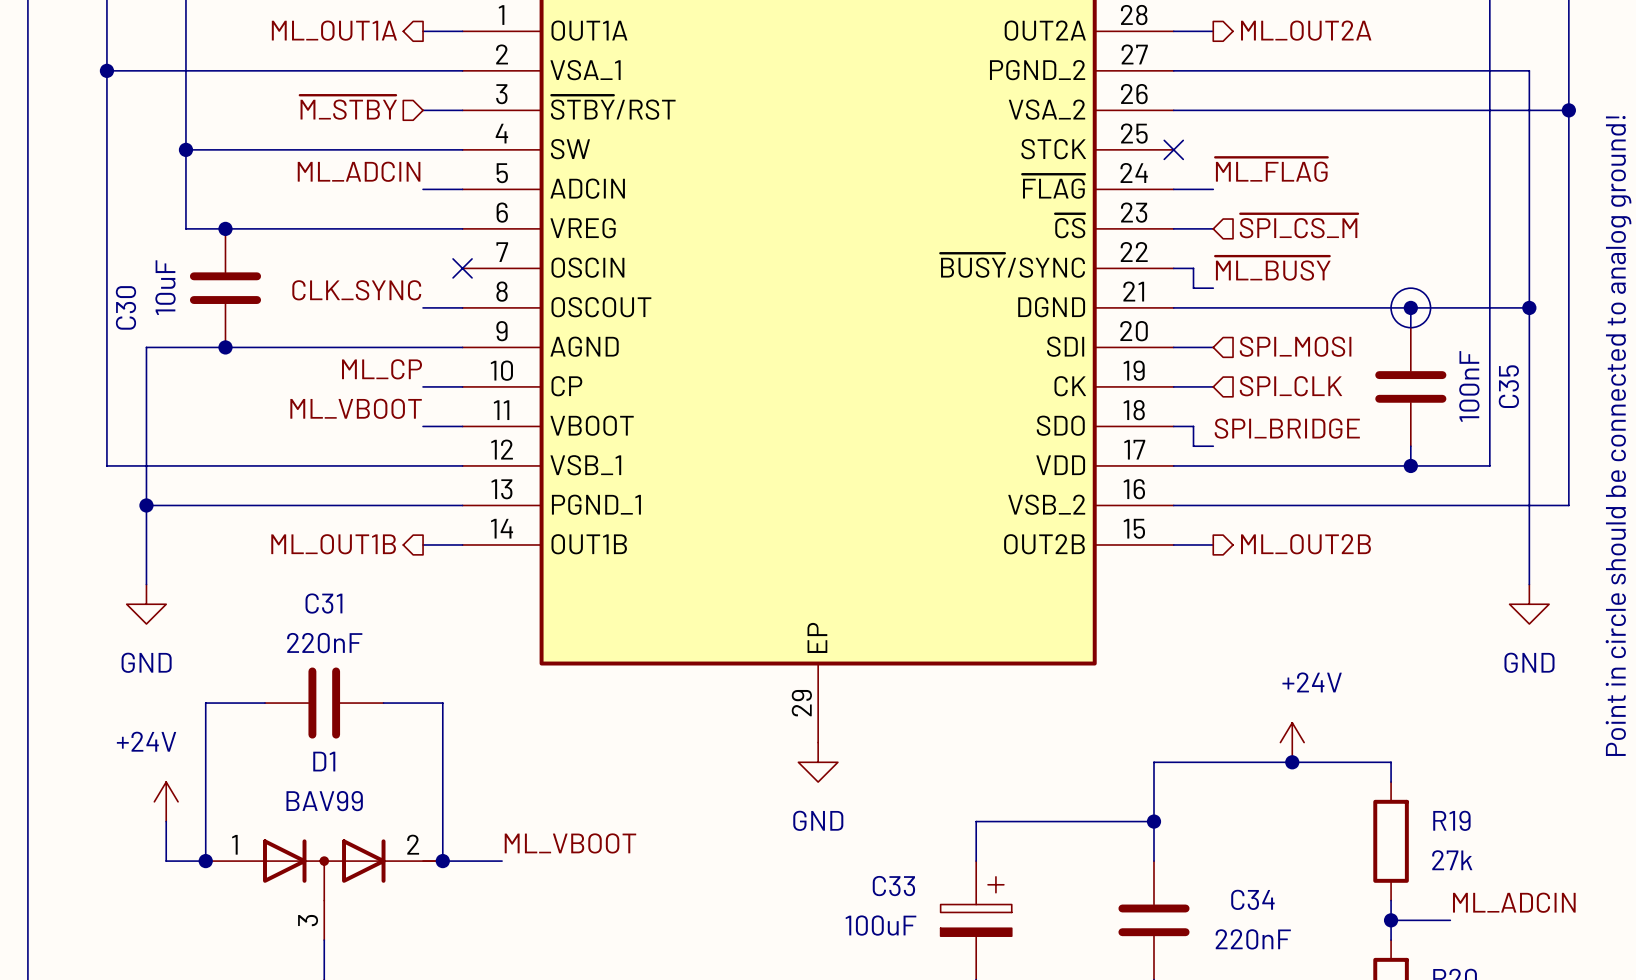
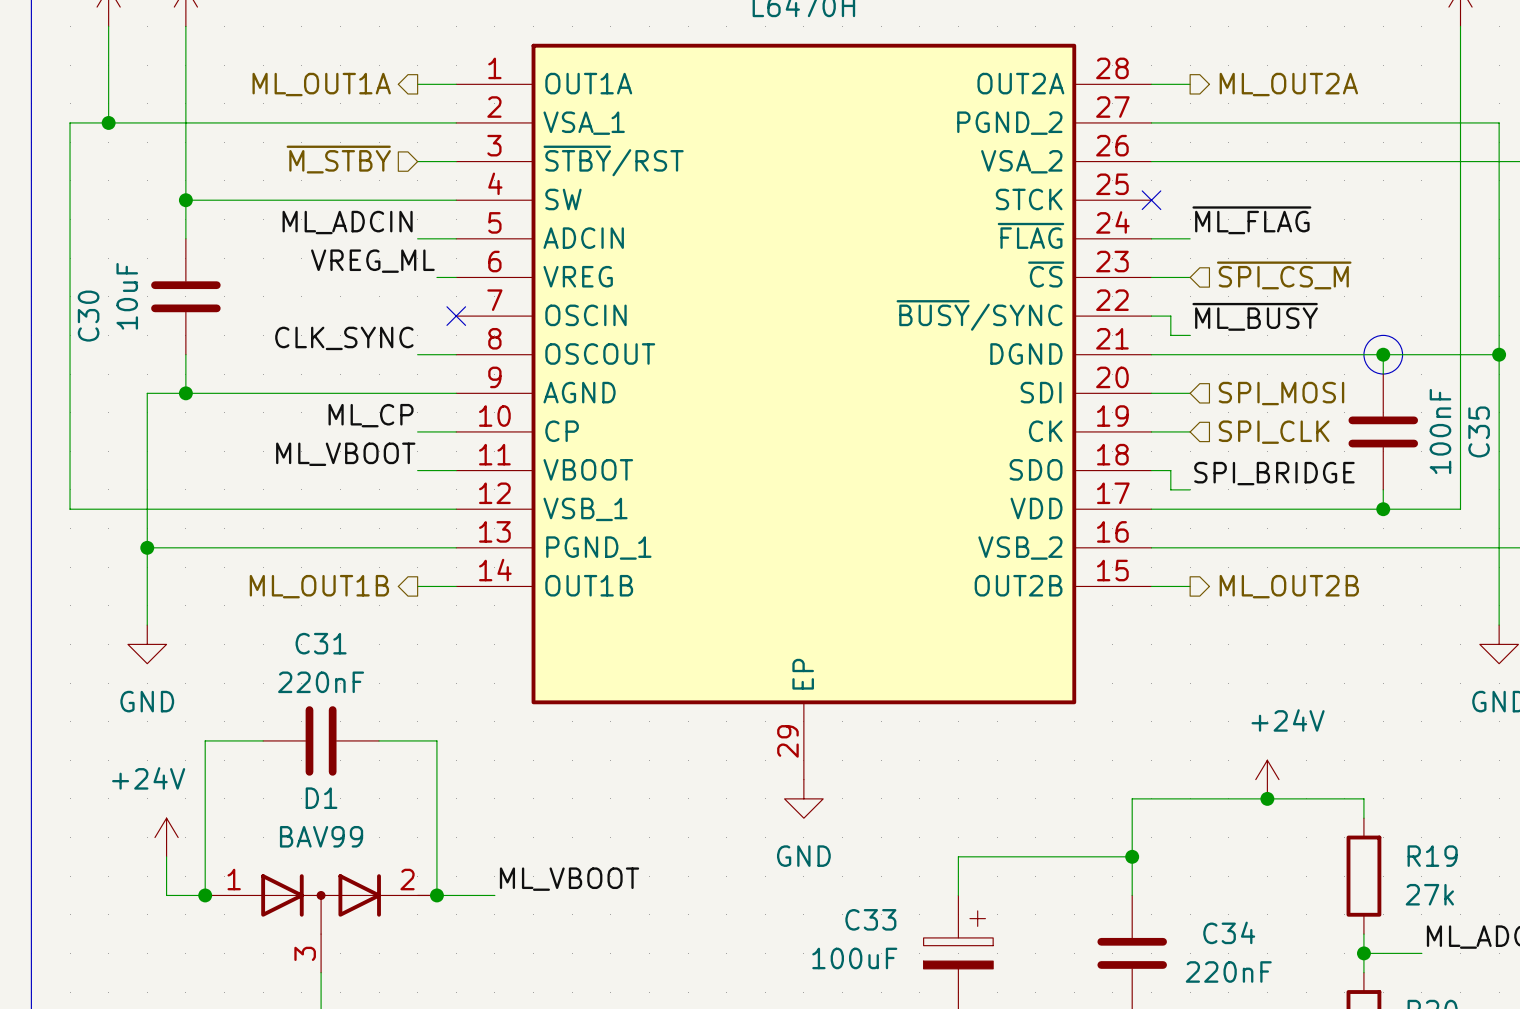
wire: (106, 70) (106, 465) -> (108, 122) (70, 122) (70, 509) (108, 509)
wire: (185, 189) (185, 228) (442, 228) -> none
label: none -> VREG_ML (372, 261)
junction: (225, 228) -> none
C30 position: (225, 288) -> (185, 296)
wire: none -> (185, 354) (185, 393)
junction position: (225, 347) -> (185, 393)

